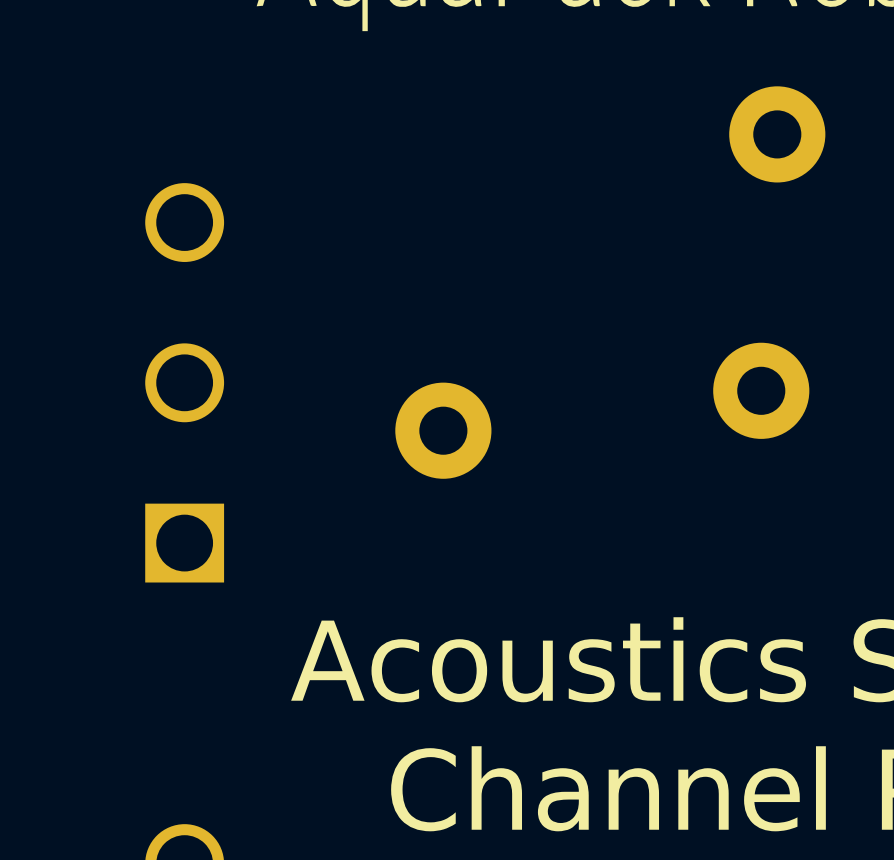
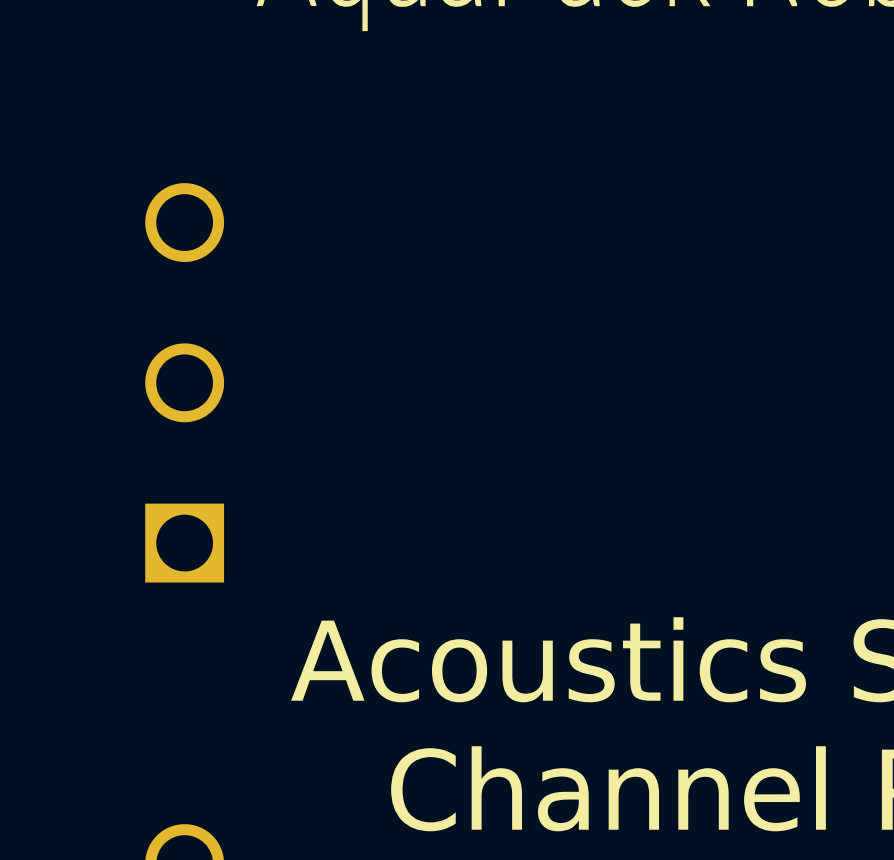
part: (777, 134) -> none
part: (761, 390) -> none
part: (443, 430) -> none

